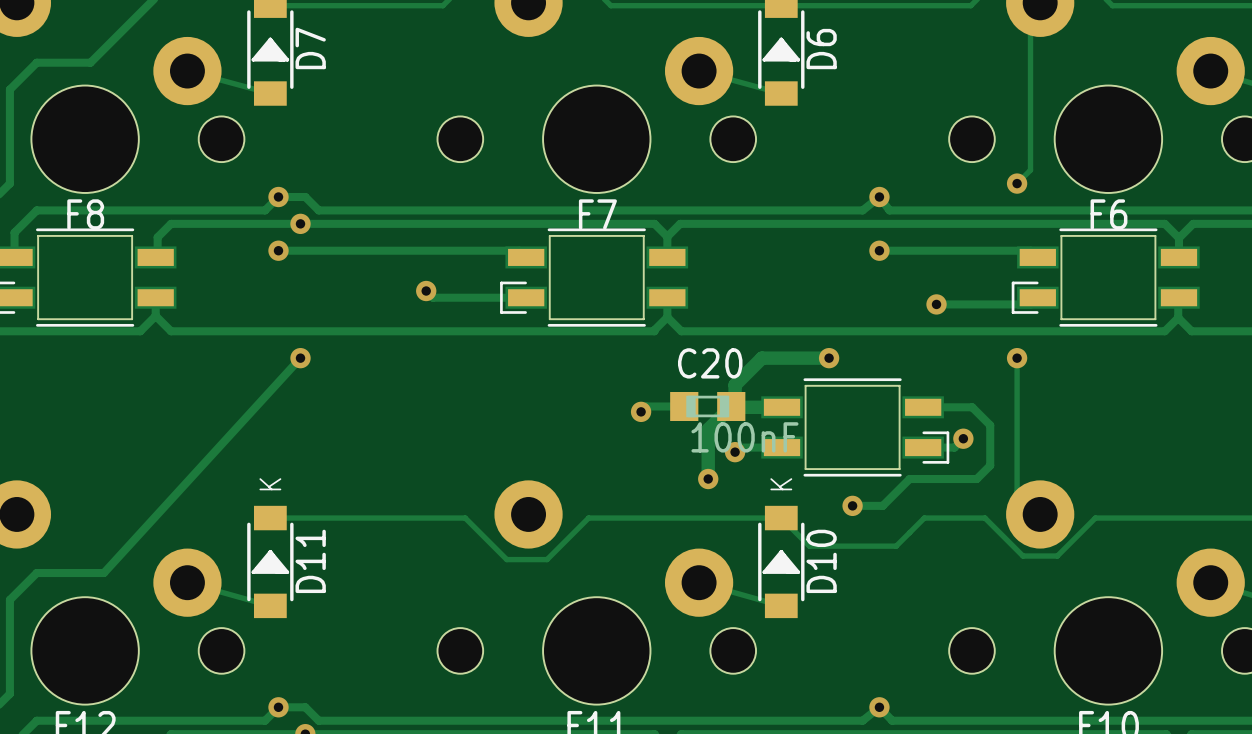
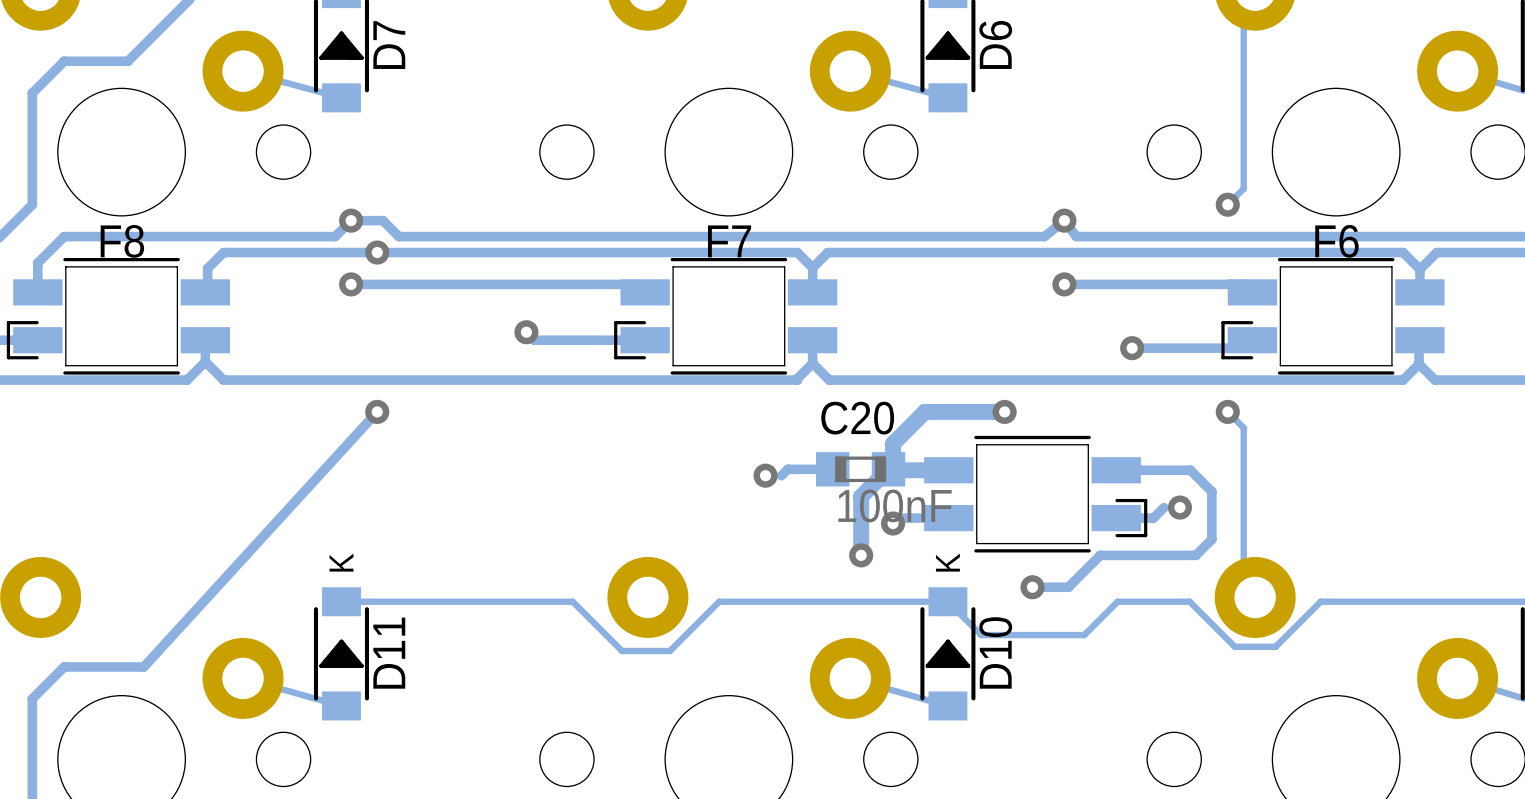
track: (1017, 358) (1017, 491) (1030, 504) -> (1227, 411) (1243, 427) (1243, 585)
track: (972, 407) (990, 425) (990, 465) (976, 479) -> (1174, 470) (1190, 470) (1211, 491) (1211, 539) (1195, 555) (1179, 555)
via position: (641, 411) -> (765, 475)
via position: (963, 438) -> (1179, 507)

